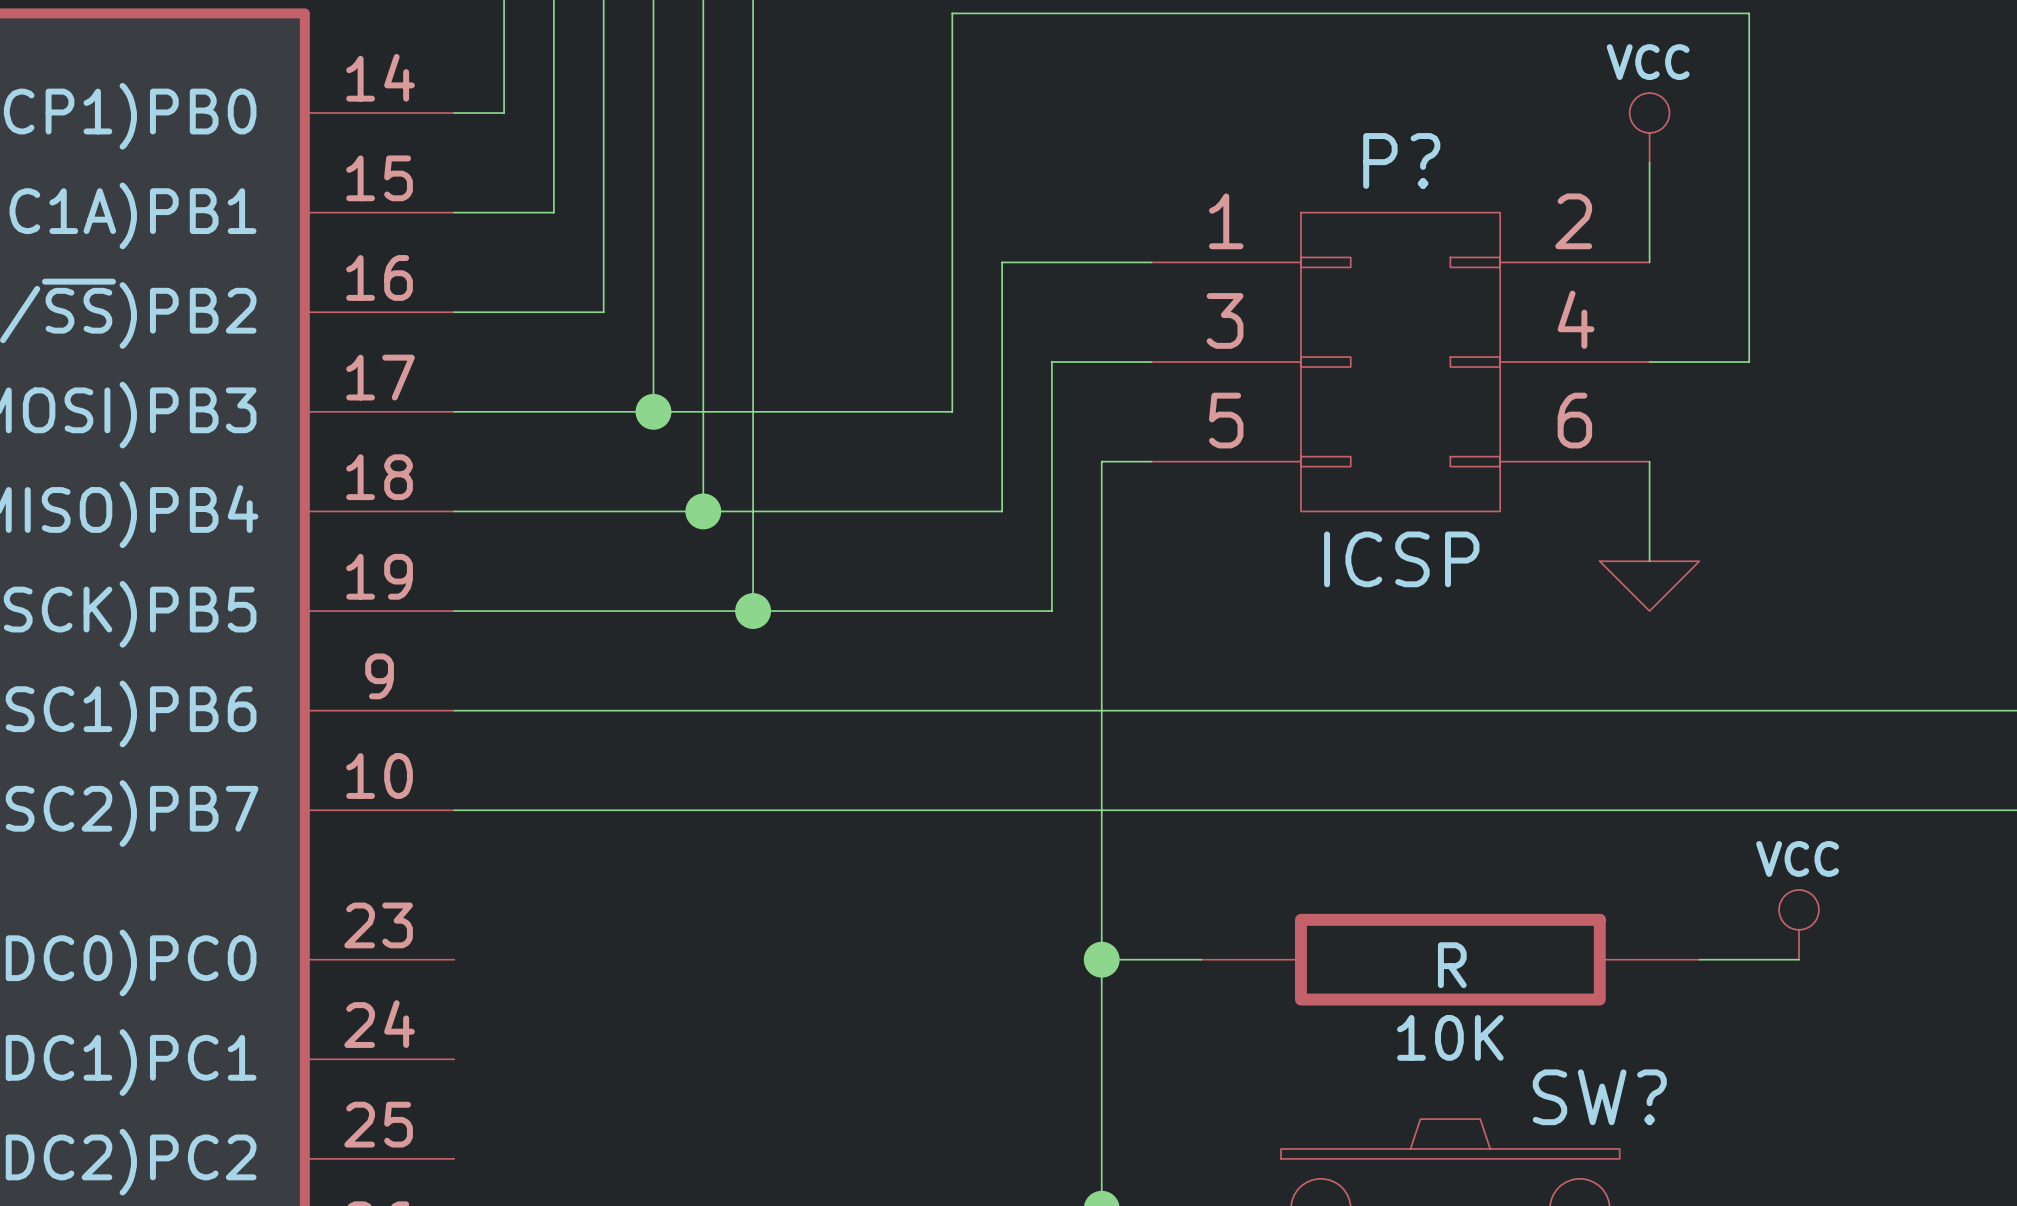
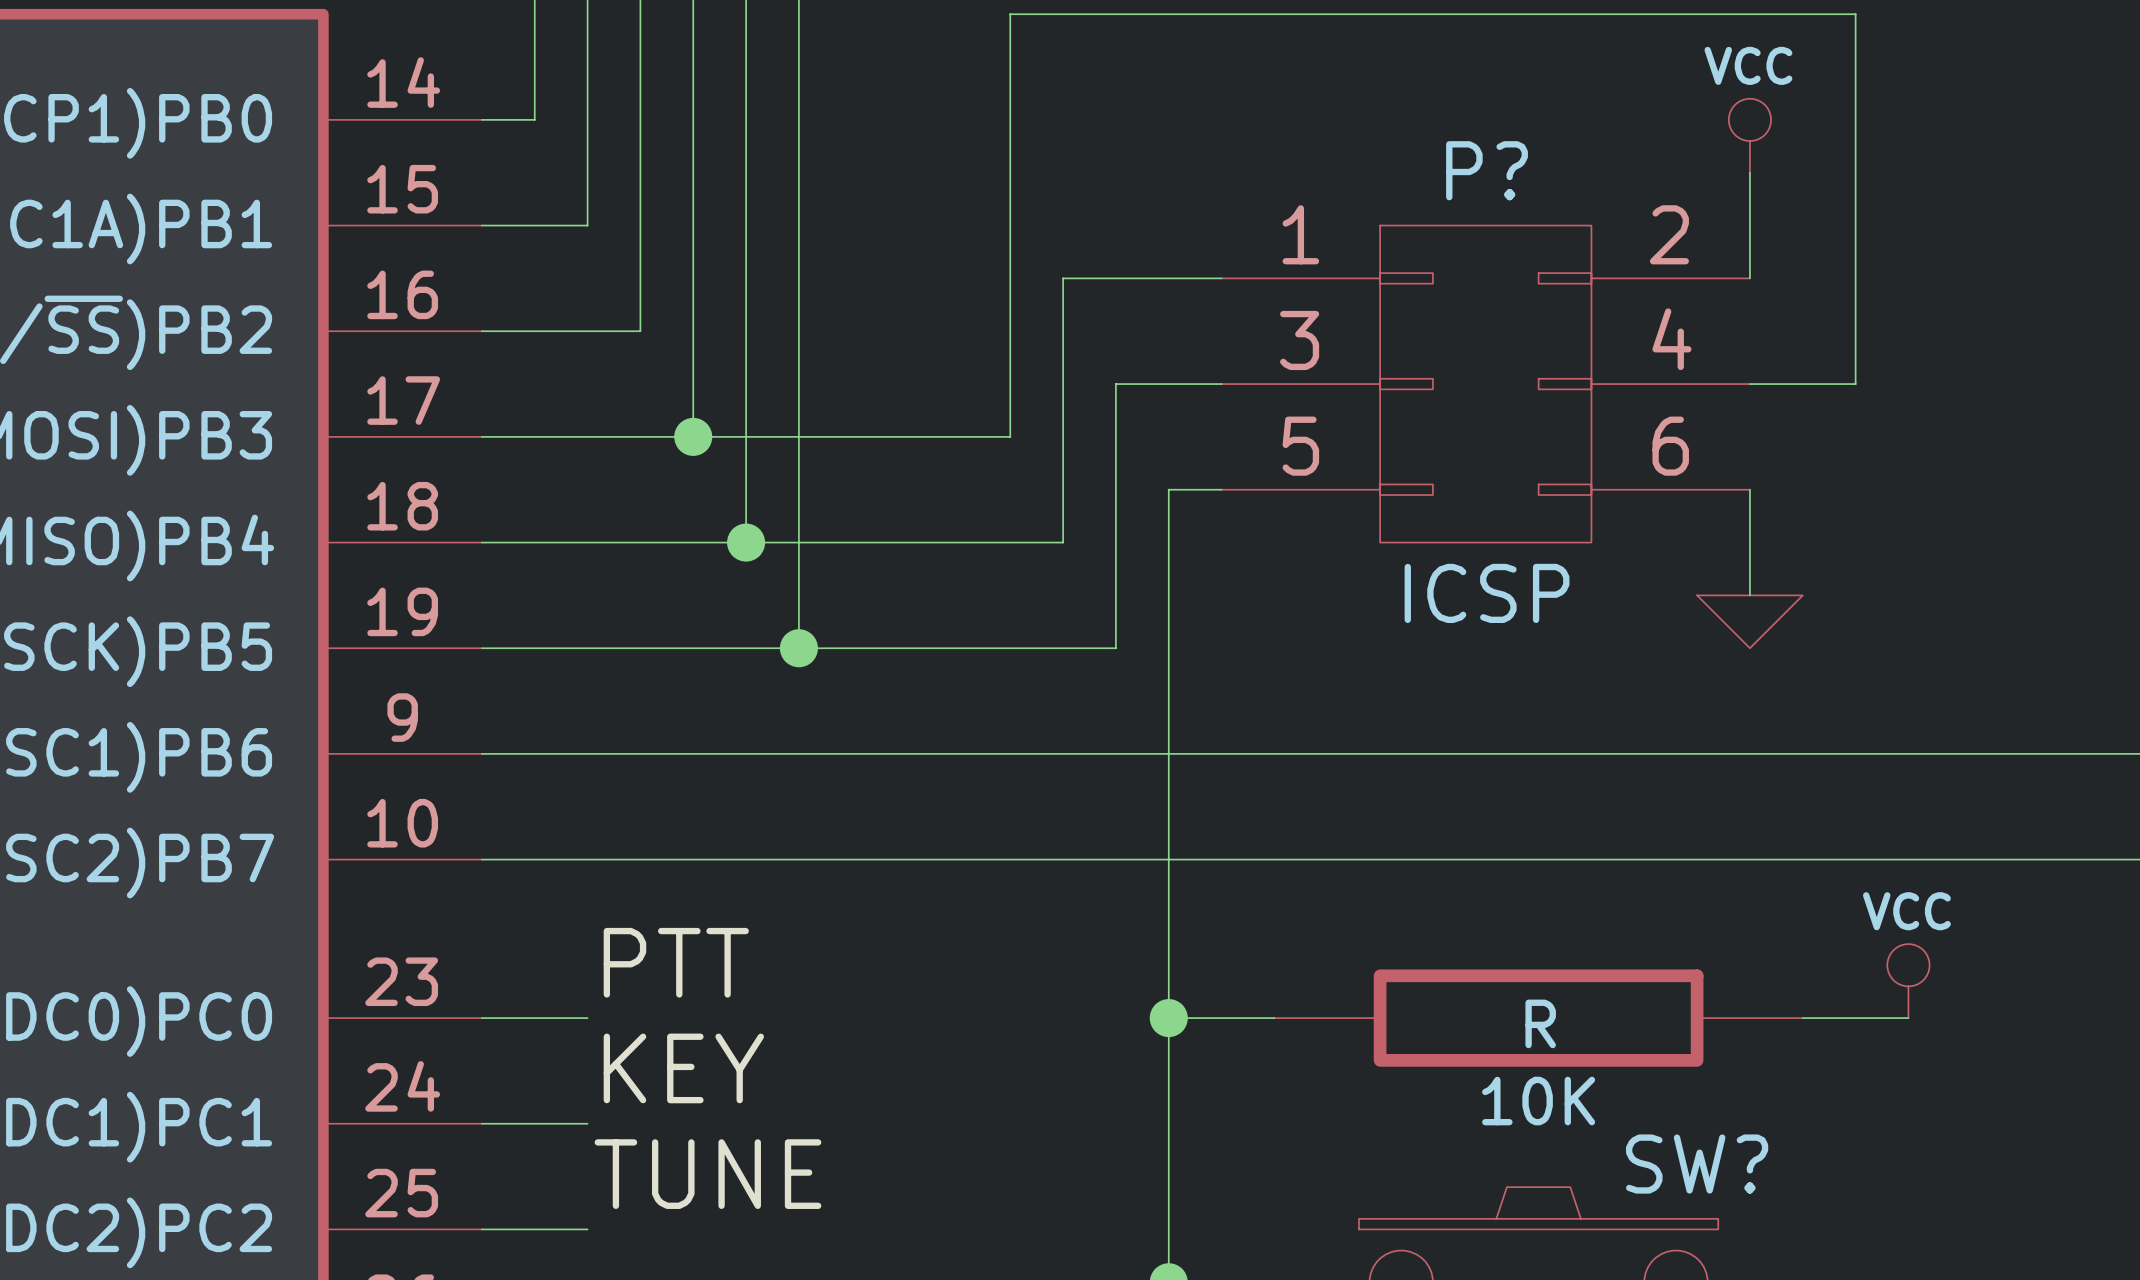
label: none -> PTT (676, 962)
wire: none -> (481, 1018) (587, 1018)
label: none -> KEY (683, 1068)
wire: none -> (481, 1123) (587, 1123)
label: none -> TUNE (707, 1174)
wire: none -> (481, 1229) (587, 1229)

